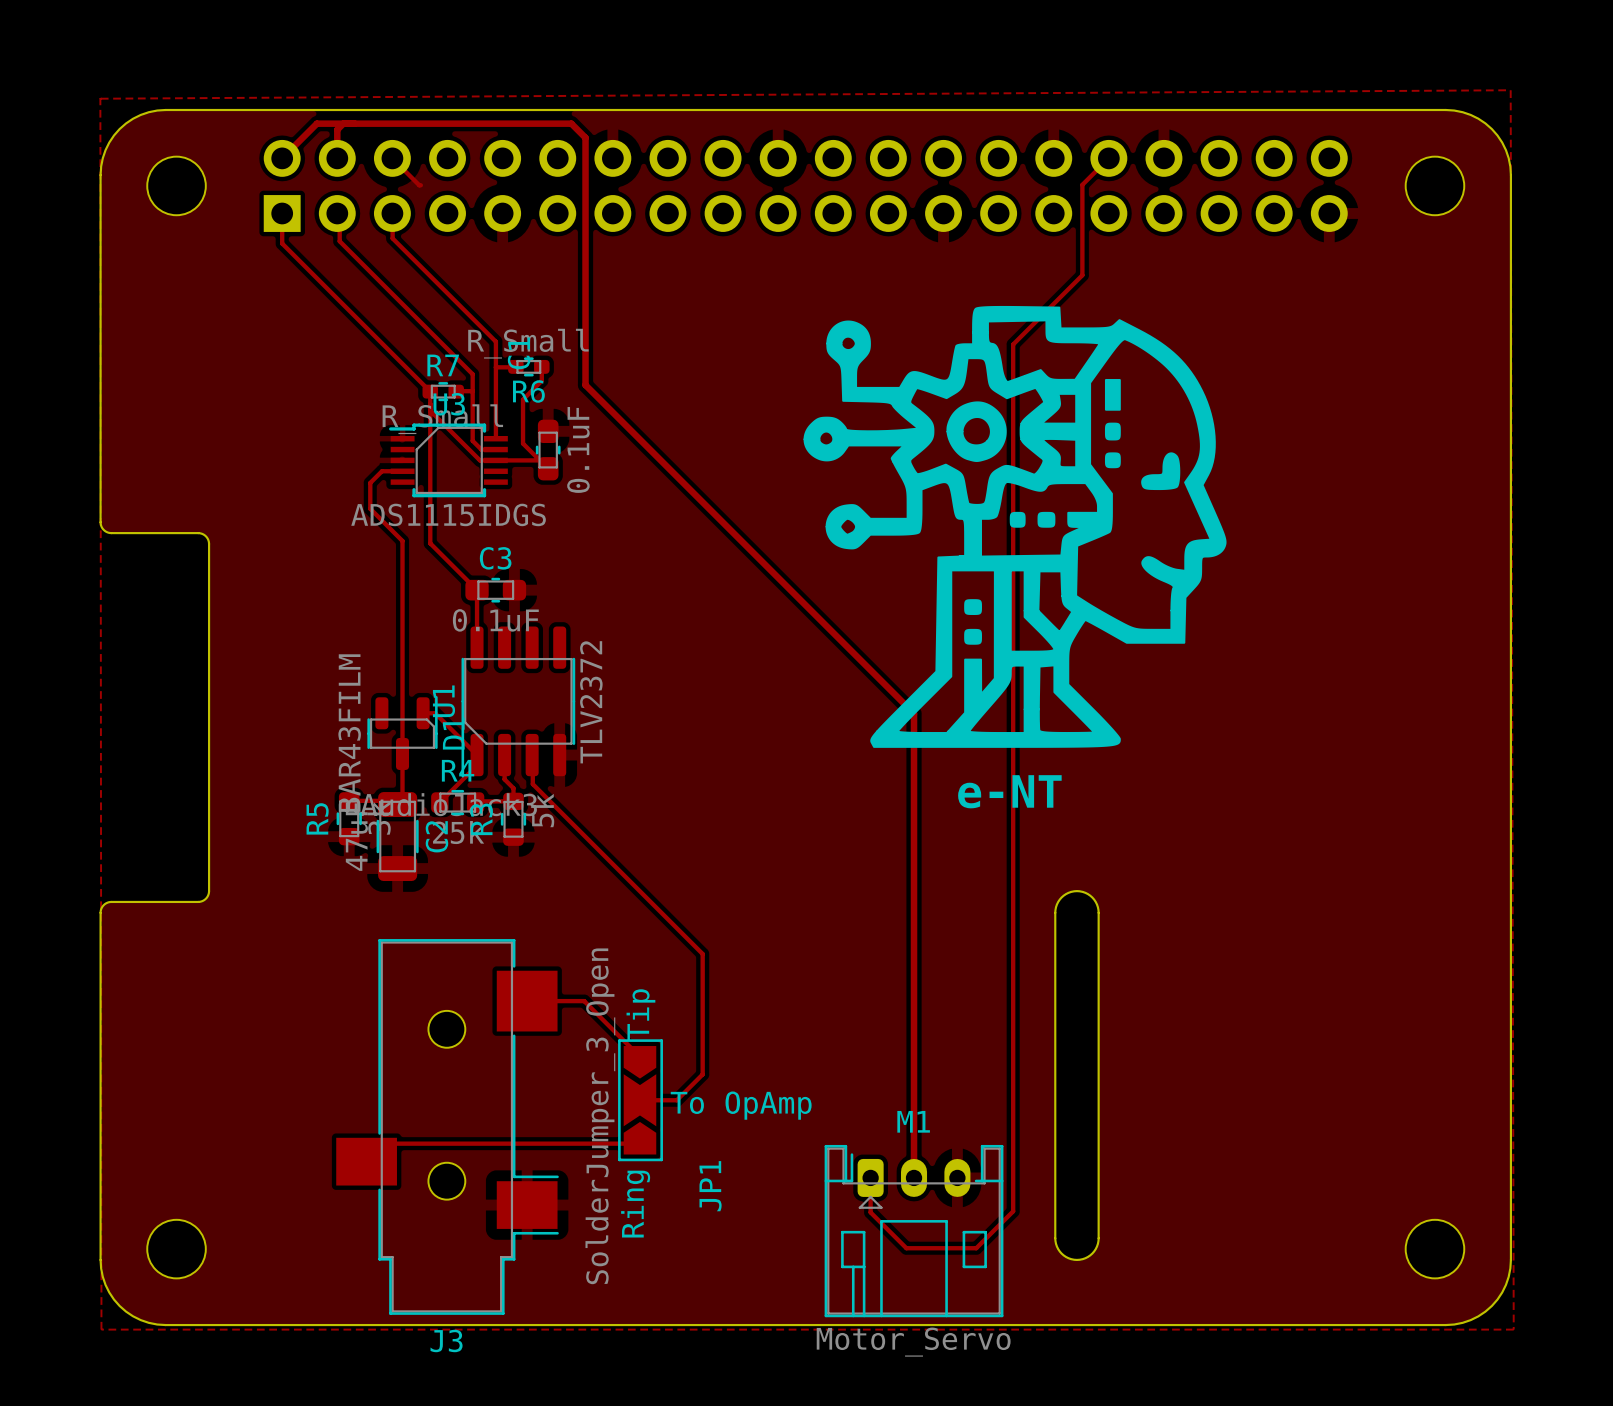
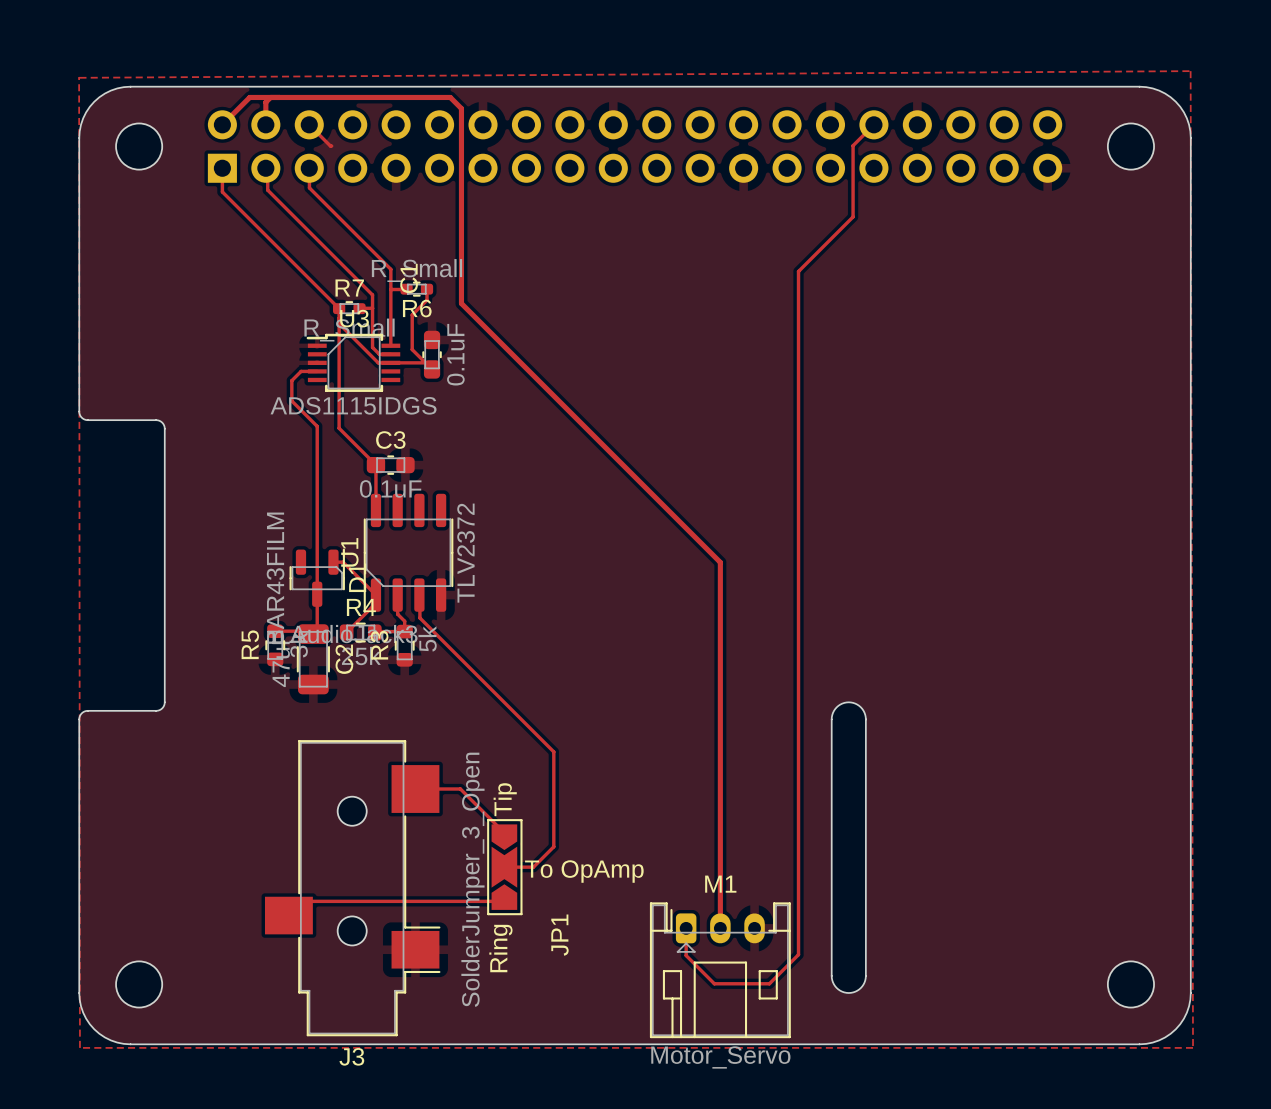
drawing: [803, 305, 1227, 748] -> none
text: e-NT (1009, 791) -> none

